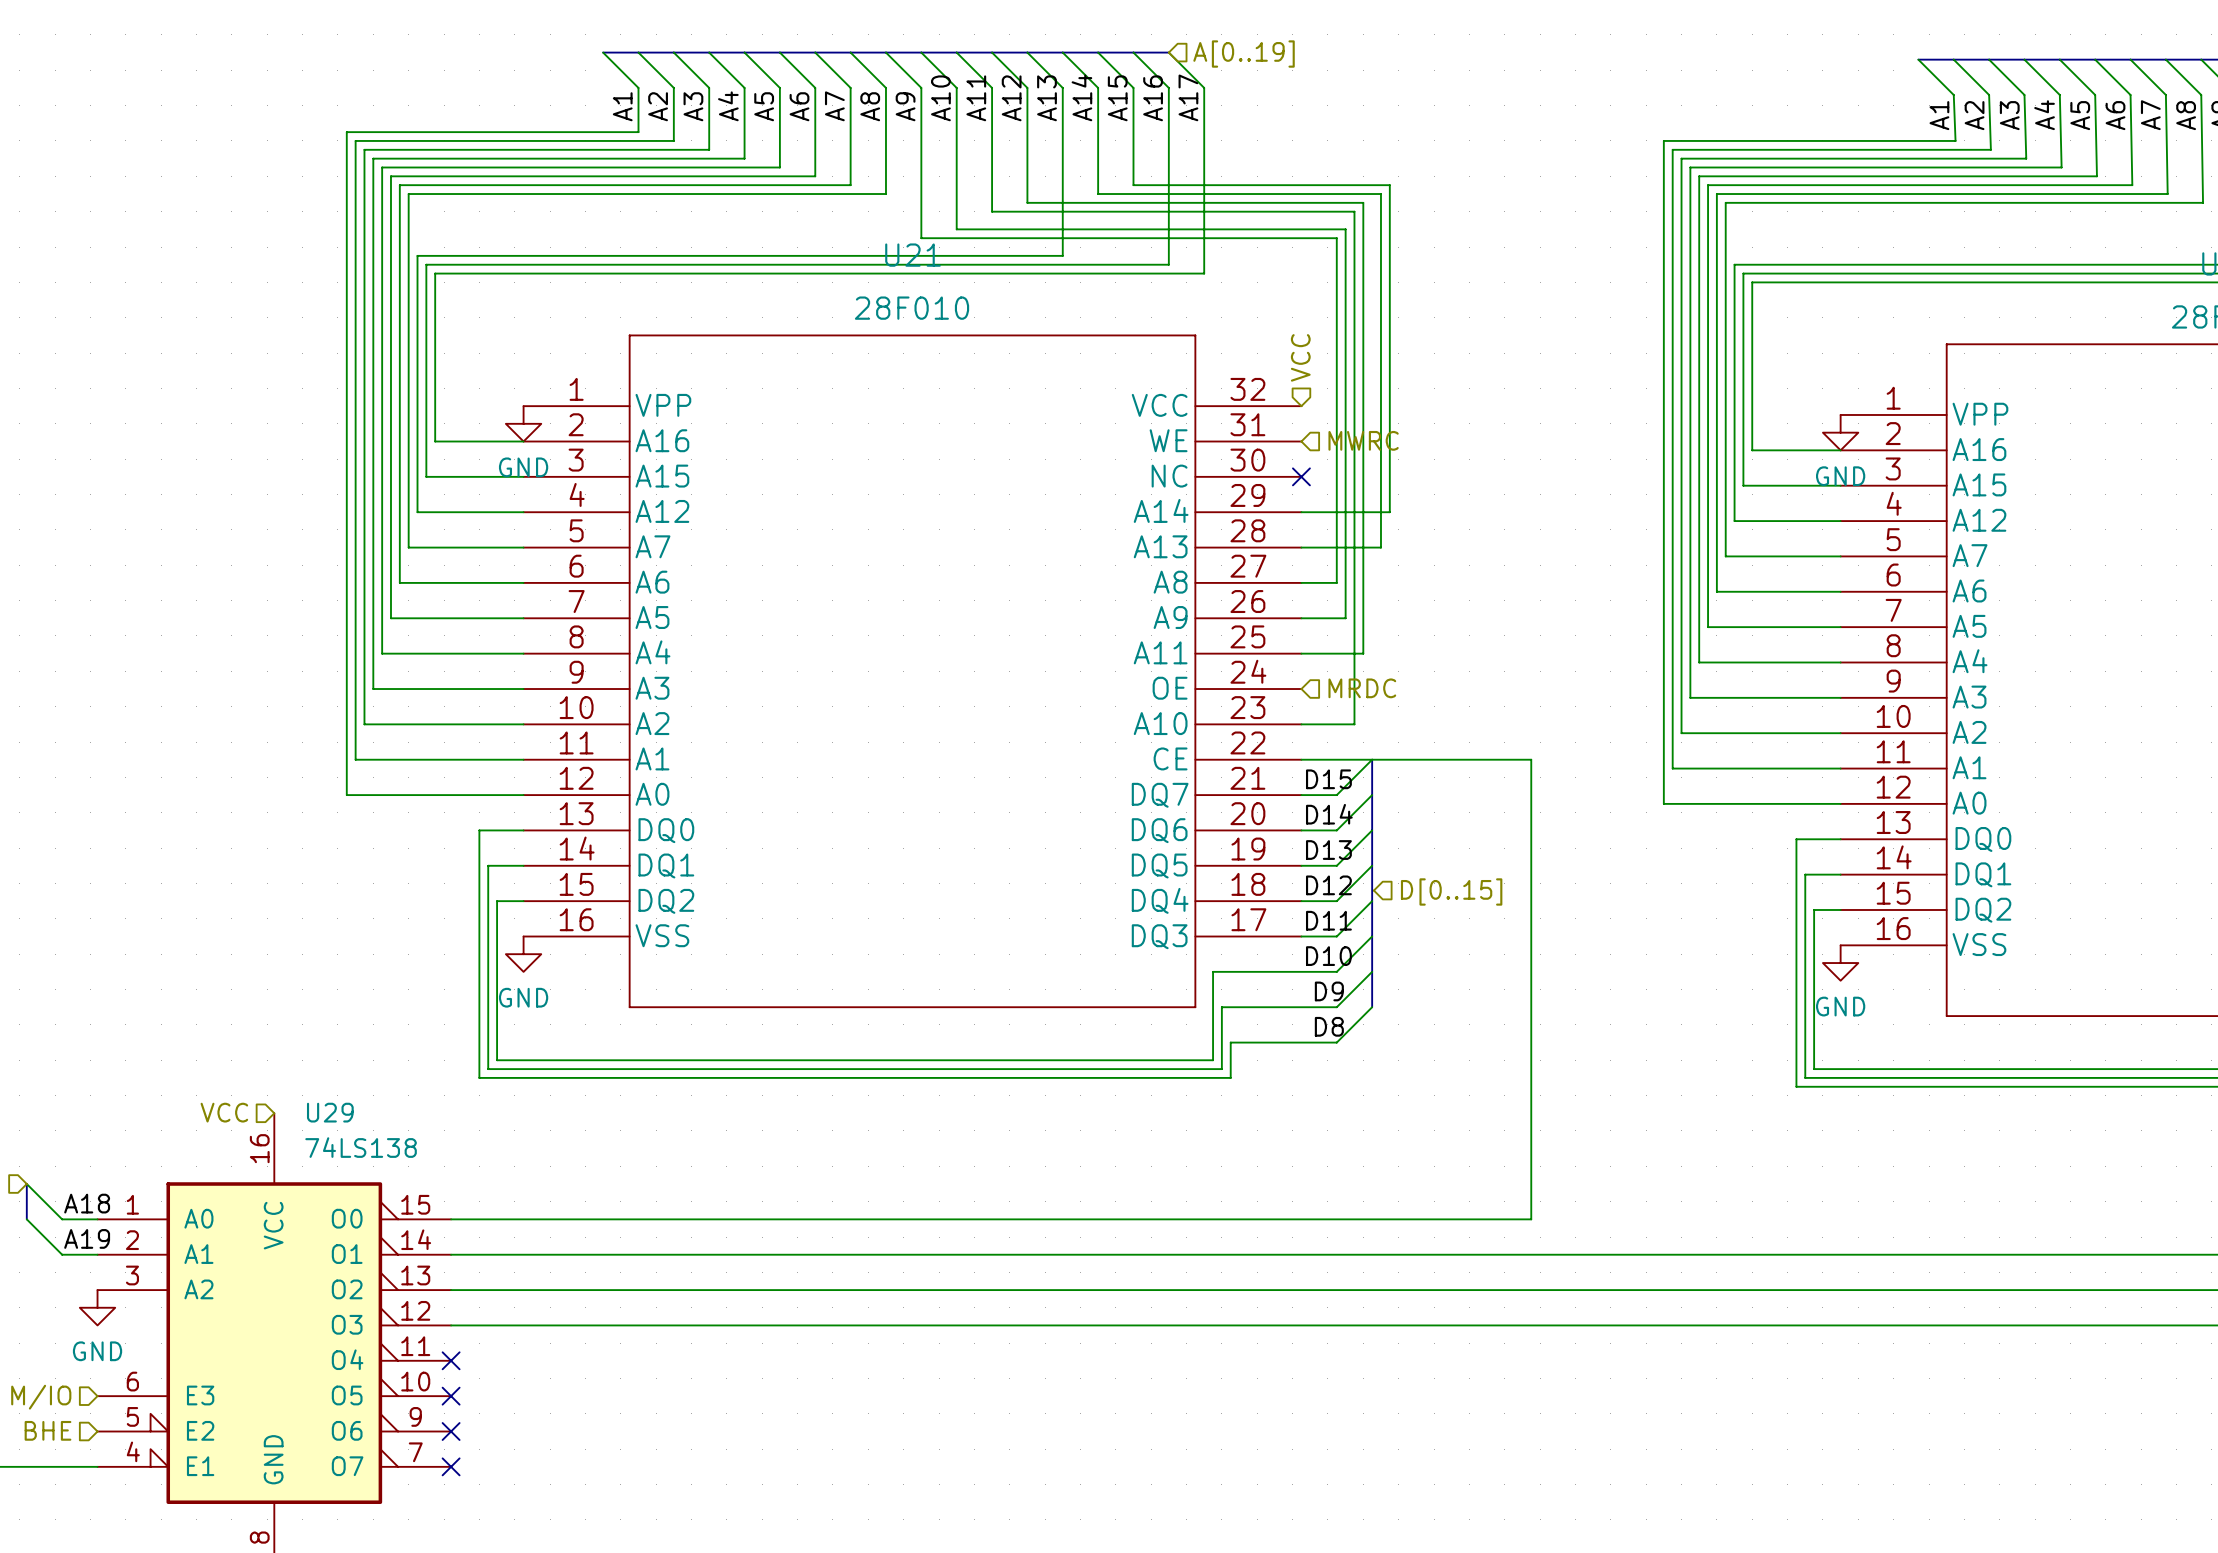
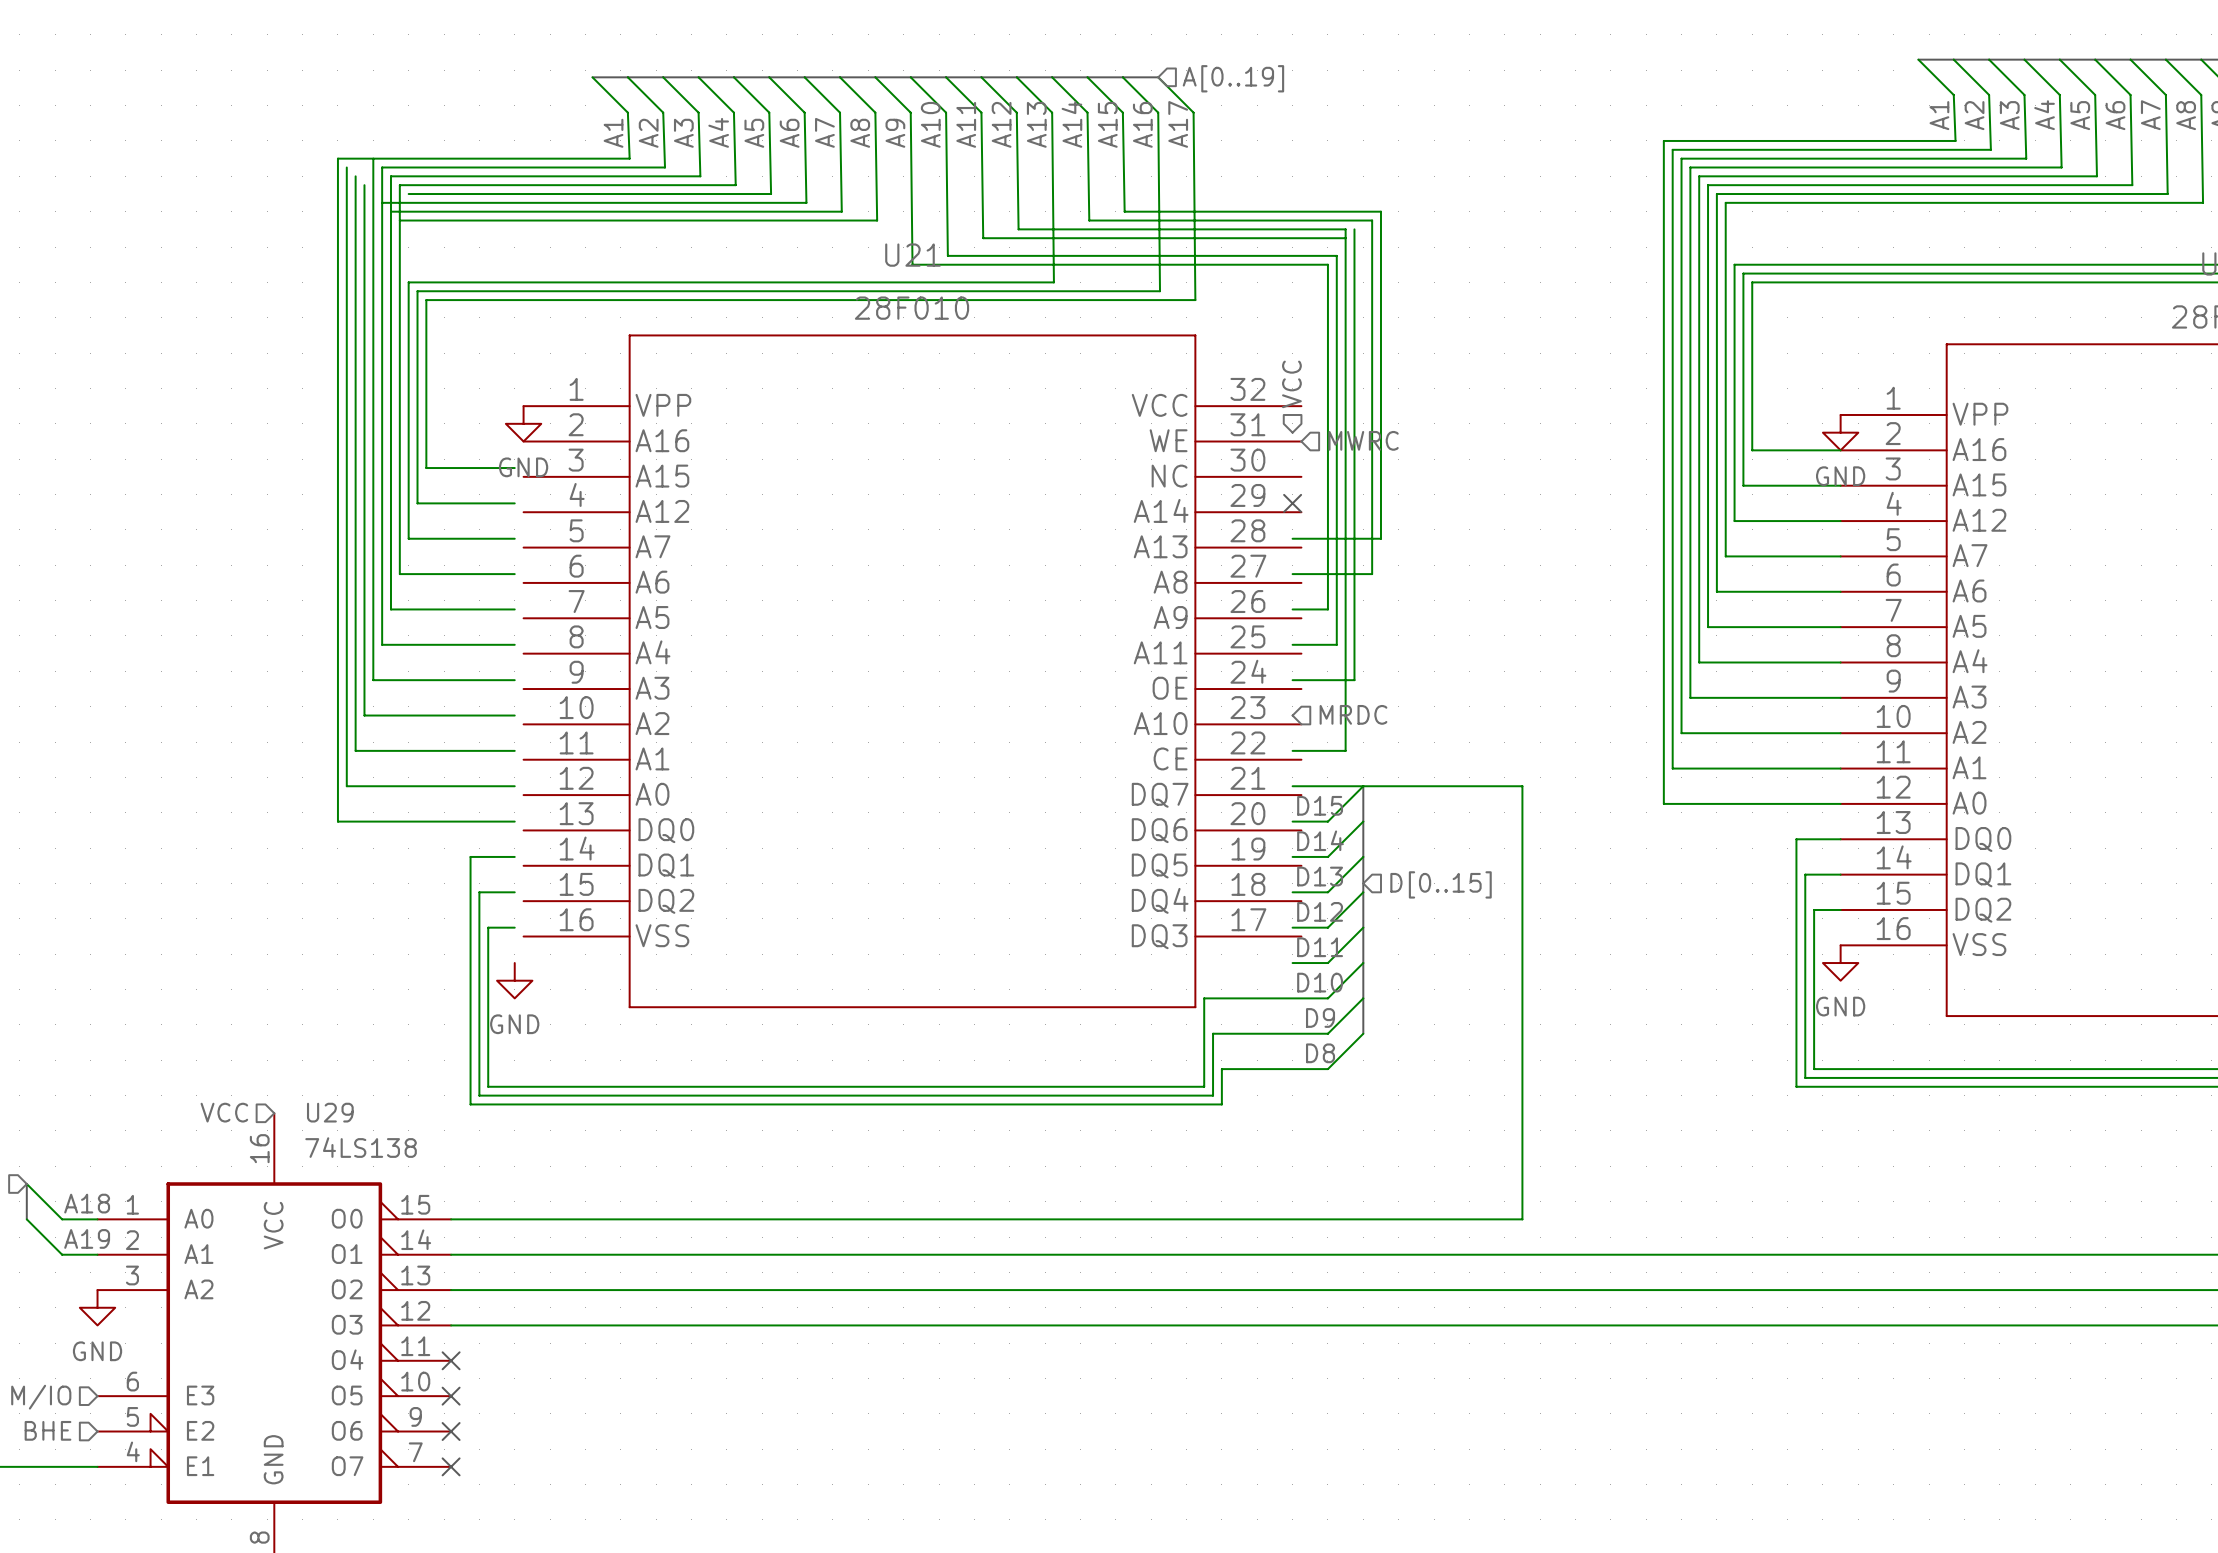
wire: (603, 52) (627, 77) -> none
bus: (603, 52) (1168, 52) -> (592, 77) (1158, 77)
wire: (638, 52) (663, 77) -> none
wire: (673, 52) (698, 77) -> none
wire: (709, 52) (733, 77) -> none
wire: (744, 52) (769, 77) -> none
wire: (779, 52) (804, 77) -> none
wire: (815, 52) (840, 77) -> none
wire: (850, 52) (875, 77) -> none
wire: (885, 52) (910, 77) -> none
wire: (921, 52) (946, 77) -> none
wire: (956, 52) (981, 77) -> none
wire: (992, 52) (1016, 77) -> none
wire: (1027, 52) (1052, 77) -> none
wire: (1062, 52) (1087, 77) -> none
wire: (1098, 52) (1122, 77) -> none
wire: (1133, 52) (1158, 77) -> none
wire: (1168, 52) (1204, 87) (1204, 273) (435, 273) (435, 441) (523, 441) -> none
hierarchical label position: A[0..19] (1244, 54) -> A[0..19] (1233, 78)
wire: (638, 87) (638, 132) (346, 132) (346, 167) -> none
wire: (673, 87) (673, 140) (355, 140) (355, 176) -> none
wire: (709, 87) (709, 149) (364, 149) (364, 185) -> none
wire: (744, 87) (744, 158) (629, 158) -> (592, 77) (627, 112) (629, 158)
wire: (779, 87) (779, 167) (665, 167) -> (638, 87) (663, 112) (665, 167)
wire: none -> (779, 87) (804, 112) (806, 202) (382, 202)
wire: (815, 87) (815, 176) (700, 176) -> (673, 87) (698, 112) (700, 176)
wire: none -> (815, 87) (840, 112) (841, 211) (390, 211)
wire: (850, 87) (850, 185) (735, 185) -> (709, 87) (733, 112) (735, 185)
wire: none -> (850, 87) (875, 112) (877, 220) (399, 220)
wire: (885, 87) (885, 194) (771, 194) -> (744, 87) (769, 112) (771, 194)
wire: none -> (885, 87) (910, 112) (912, 264)
wire: (921, 87) (921, 238) (983, 238) -> (956, 87) (981, 112) (983, 238)
wire: none -> (921, 87) (946, 112) (947, 255)
wire: (956, 87) (956, 229) (1018, 229) -> (992, 87) (1016, 112) (1018, 229)
wire: (992, 87) (992, 211) (1124, 211) -> (1098, 87) (1122, 112) (1124, 211)
wire: (1027, 87) (1027, 202) (1363, 202) (1363, 653) (1301, 653) -> none
wire: (1062, 87) (1062, 255) -> (1336, 255) (1062, 255)
wire: none -> (1062, 87) (1087, 112) (1089, 220) (1372, 220) (1372, 574) (1292, 574)
wire: (1098, 87) (1098, 194) (1380, 194) (1380, 211) -> none
wire: (1133, 87) (1133, 185) (1389, 185) (1389, 512) (1301, 512) -> none
wire: (1168, 87) (1168, 264) -> (1292, 609) (1327, 609) (1327, 264) (1168, 264)
label position: A14 (1081, 97) -> A14 (1071, 124)
label position: A17 (1188, 97) -> A17 (1178, 124)
label position: A10 (940, 98) -> A10 (930, 124)
label position: A11 (976, 98) -> A11 (966, 124)
label position: A12 (1011, 98) -> A12 (1001, 124)
label position: A13 (1047, 98) -> A13 (1036, 124)
label position: A15 (1117, 98) -> A15 (1107, 124)
label position: A16 (1153, 98) -> A16 (1142, 124)
label position: A1 (622, 106) -> A1 (613, 133)
label position: A2 (658, 106) -> A2 (648, 133)
label position: A3 (693, 106) -> A3 (683, 133)
label position: A4 (728, 106) -> A4 (718, 132)
label position: A5 (764, 106) -> A5 (754, 133)
label position: A6 (799, 106) -> A6 (789, 133)
label position: A7 (834, 106) -> A7 (824, 132)
label position: A8 (870, 106) -> A8 (860, 133)
label position: A9 (905, 106) -> A9 (895, 133)
wire: none -> (373, 158) (337, 158) (337, 821) (514, 821)
wire: (408, 194) (408, 282) -> (1027, 87) (1052, 112) (1053, 282) (408, 282)
wire: (1354, 211) (1354, 229) -> (1354, 211) (1380, 211)
wire: (1336, 238) (1336, 255) -> (1336, 238) (1345, 238)
wire: (947, 255) (417, 255) (417, 291) -> (1133, 87) (1158, 112) (1160, 291) (417, 291)
wire: (912, 264) (426, 264) (426, 300) -> (1168, 87) (1193, 112) (1195, 300) (426, 300)
hierarchical label position: VCC (1300, 357) -> VCC (1291, 384)
wire: (426, 468) (426, 476) (523, 476) -> (426, 468) (514, 468)
no-connect mark position: (1301, 476) -> (1292, 503)
wire: (417, 503) (417, 512) (523, 512) -> (417, 503) (514, 503)
wire: (408, 538) (408, 547) (523, 547) -> (408, 538) (514, 538)
wire: (1380, 538) (1380, 547) (1301, 547) -> (1380, 538) (1292, 538)
wire: (399, 574) (399, 582) (523, 582) -> (399, 574) (514, 574)
wire: (1301, 582) (1336, 582) -> (1292, 644) (1336, 644) (1336, 582)
wire: (390, 609) (390, 618) (523, 618) -> (390, 609) (514, 609)
wire: (1301, 618) (1345, 618) -> (1292, 750) (1345, 750) (1345, 618)
wire: (382, 644) (382, 653) (523, 653) -> (382, 644) (514, 644)
wire: (373, 680) (373, 689) (523, 689) -> (373, 680) (514, 680)
wire: (1354, 680) (1354, 724) (1301, 724) -> (1354, 680) (1292, 680)
hierarchical label position: MRDC (1362, 688) -> MRDC (1353, 714)
wire: (364, 715) (364, 724) (523, 724) -> (364, 715) (514, 715)
wire: (355, 750) (355, 759) (523, 759) -> (355, 750) (514, 750)
wire: (1301, 759) (1531, 759) (1531, 1219) (1522, 1219) -> (1292, 786) (1522, 786) (1522, 1219)
wire: (1372, 759) (1336, 795) -> (1363, 786) (1327, 821)
bus: (1372, 759) (1372, 1007) -> (1363, 786) (1363, 1033)
label position: D15 (1328, 779) -> D15 (1320, 805)
wire: (346, 786) (346, 795) (523, 795) -> (346, 786) (514, 786)
wire: (1301, 795) (1336, 795) -> (1292, 821) (1327, 821)
wire: (1372, 795) (1336, 830) -> none
label position: D14 (1329, 814) -> D14 (1320, 840)
wire: none -> (1363, 821) (1327, 856) (1292, 856)
wire: (523, 830) (479, 830) (479, 892) -> (514, 892) (479, 892)
wire: (1301, 830) (1336, 830) -> none
wire: (1372, 830) (1336, 865) -> none
label position: D13 (1328, 850) -> D13 (1320, 876)
wire: none -> (514, 856) (470, 856) (470, 1104) (1221, 1104) (1221, 1069) (1327, 1069)
wire: none -> (1363, 856) (1327, 892) (1292, 892)
wire: (523, 865) (488, 865) (488, 927) -> (514, 927) (488, 927)
wire: (1301, 865) (1336, 865) -> none
wire: (1372, 865) (1336, 901) -> (1363, 892) (1327, 927)
label position: D12 (1328, 885) -> D12 (1320, 911)
hierarchical label position: D[0..15] (1451, 891) -> D[0..15] (1441, 884)
wire: (523, 901) (497, 901) (497, 1060) (1213, 1060) -> none
wire: (1301, 901) (1336, 901) -> (1292, 927) (1327, 927)
wire: (1372, 901) (1336, 936) -> none
label position: D11 (1328, 920) -> D11 (1320, 947)
wire: none -> (1363, 927) (1327, 963) (1292, 963)
wire: (1301, 936) (1336, 936) -> none
wire: (1372, 936) (1336, 971) -> (1363, 963) (1327, 998)
power symbol position: GND (523, 954) -> GND (514, 980)
label position: D10 (1328, 956) -> D10 (1320, 982)
wire: (1336, 971) (1213, 971) (1213, 1033) -> (1363, 998) (1327, 1033) (1213, 1033)
wire: (1372, 971) (1336, 1007) -> none
label position: D9 (1329, 991) -> D9 (1320, 1017)
wire: (1336, 1007) (1221, 1007) (1221, 1069) (488, 1069) -> (1327, 998) (1204, 998) (1204, 1086) (488, 1086) (488, 1069)
wire: (1372, 1007) (1336, 1042) -> (1363, 1033) (1327, 1069)
label position: D8 (1329, 1026) -> D8 (1320, 1053)
wire: (1336, 1042) (1230, 1042) (1230, 1077) (479, 1077) -> (1213, 1060) (1213, 1095) (479, 1095) (479, 1077)

